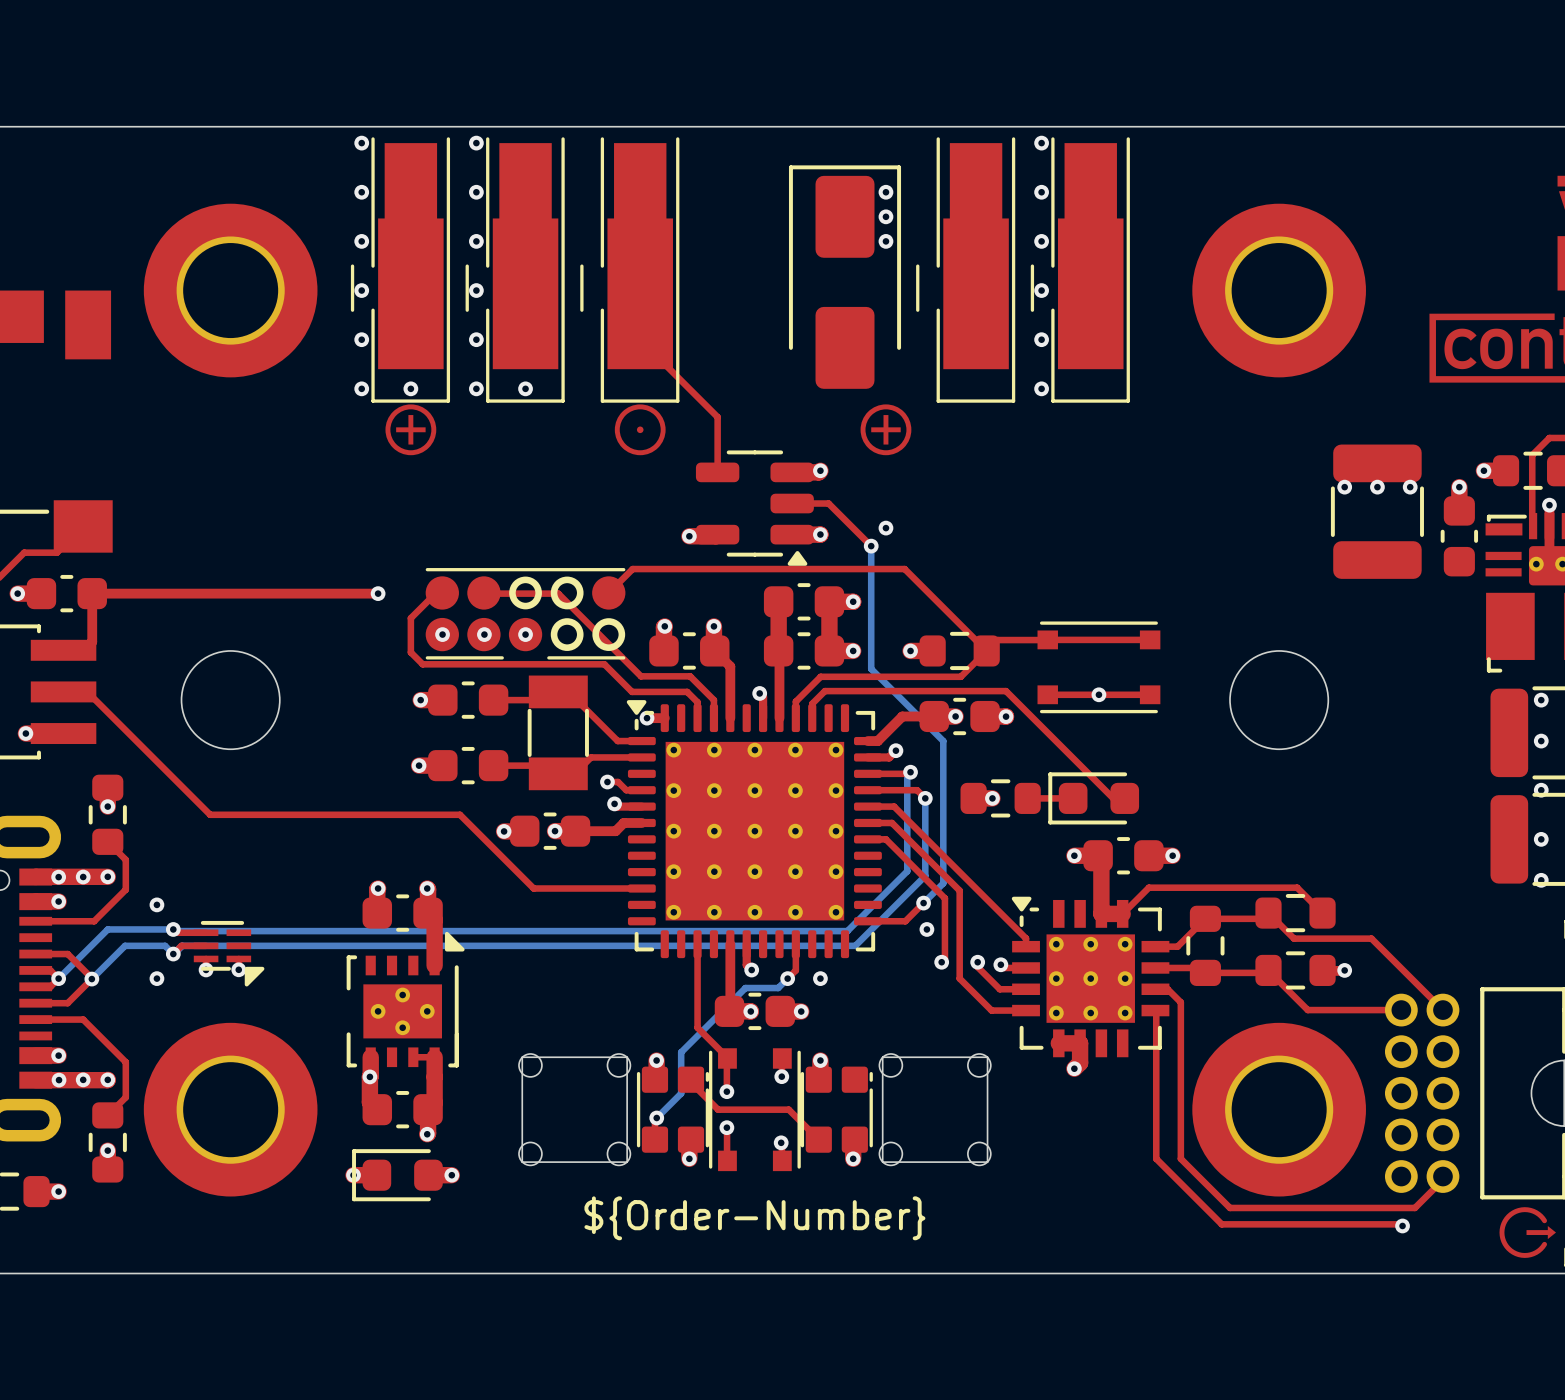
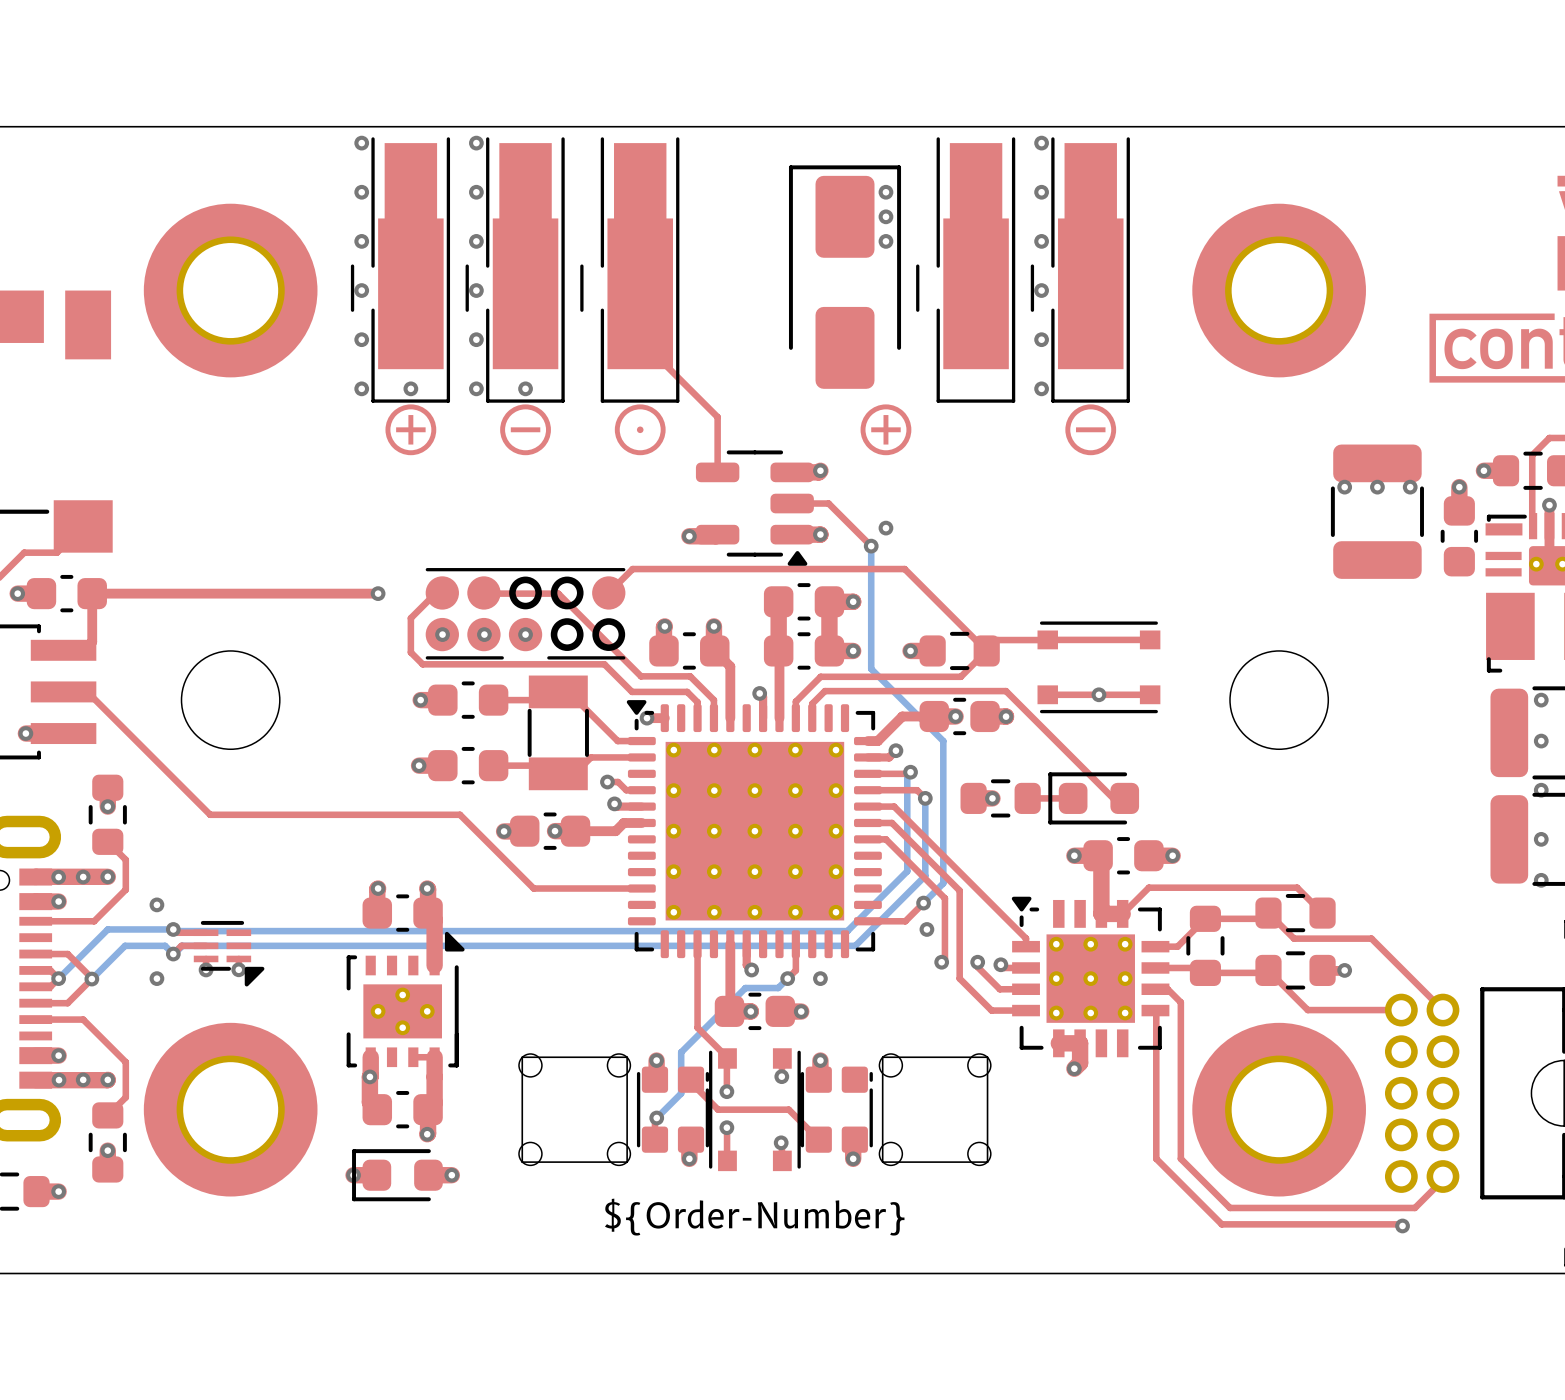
drawing: none -> [500, 404, 551, 456]
drawing: none -> [1065, 404, 1117, 456]
drawing: [1499, 1207, 1557, 1258] -> none

